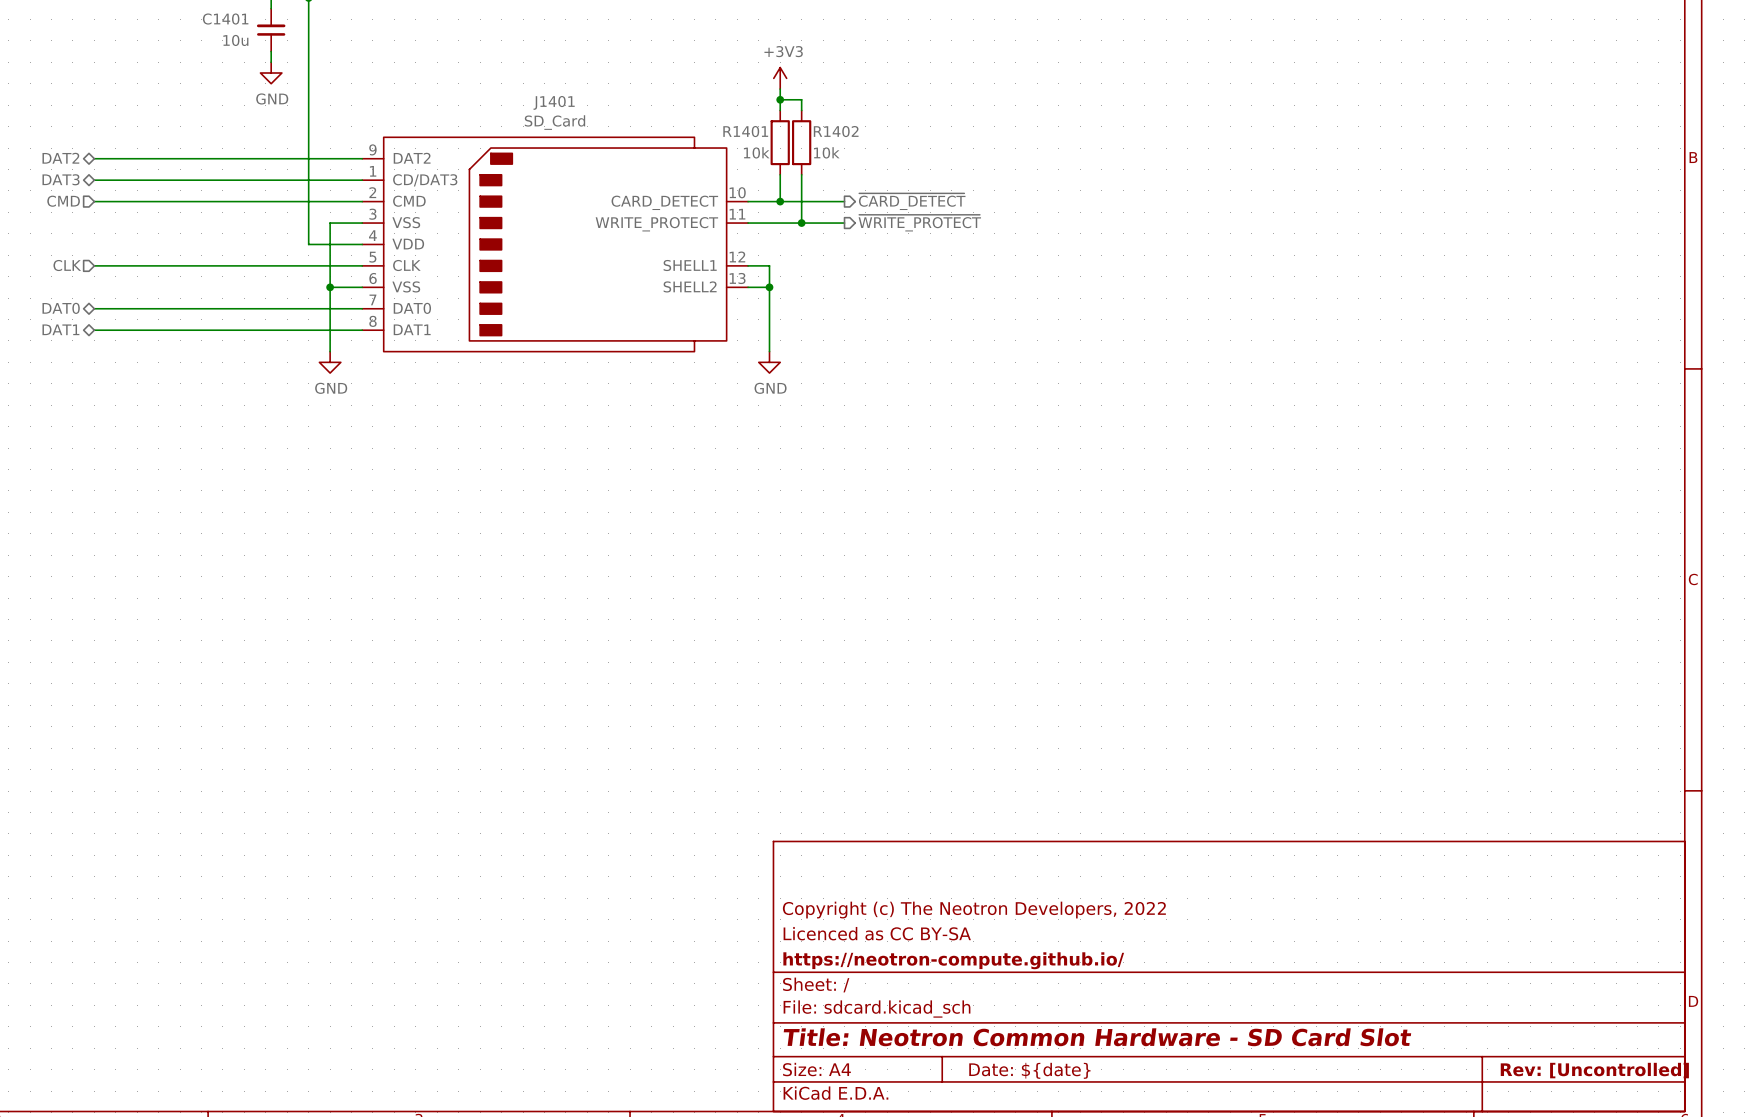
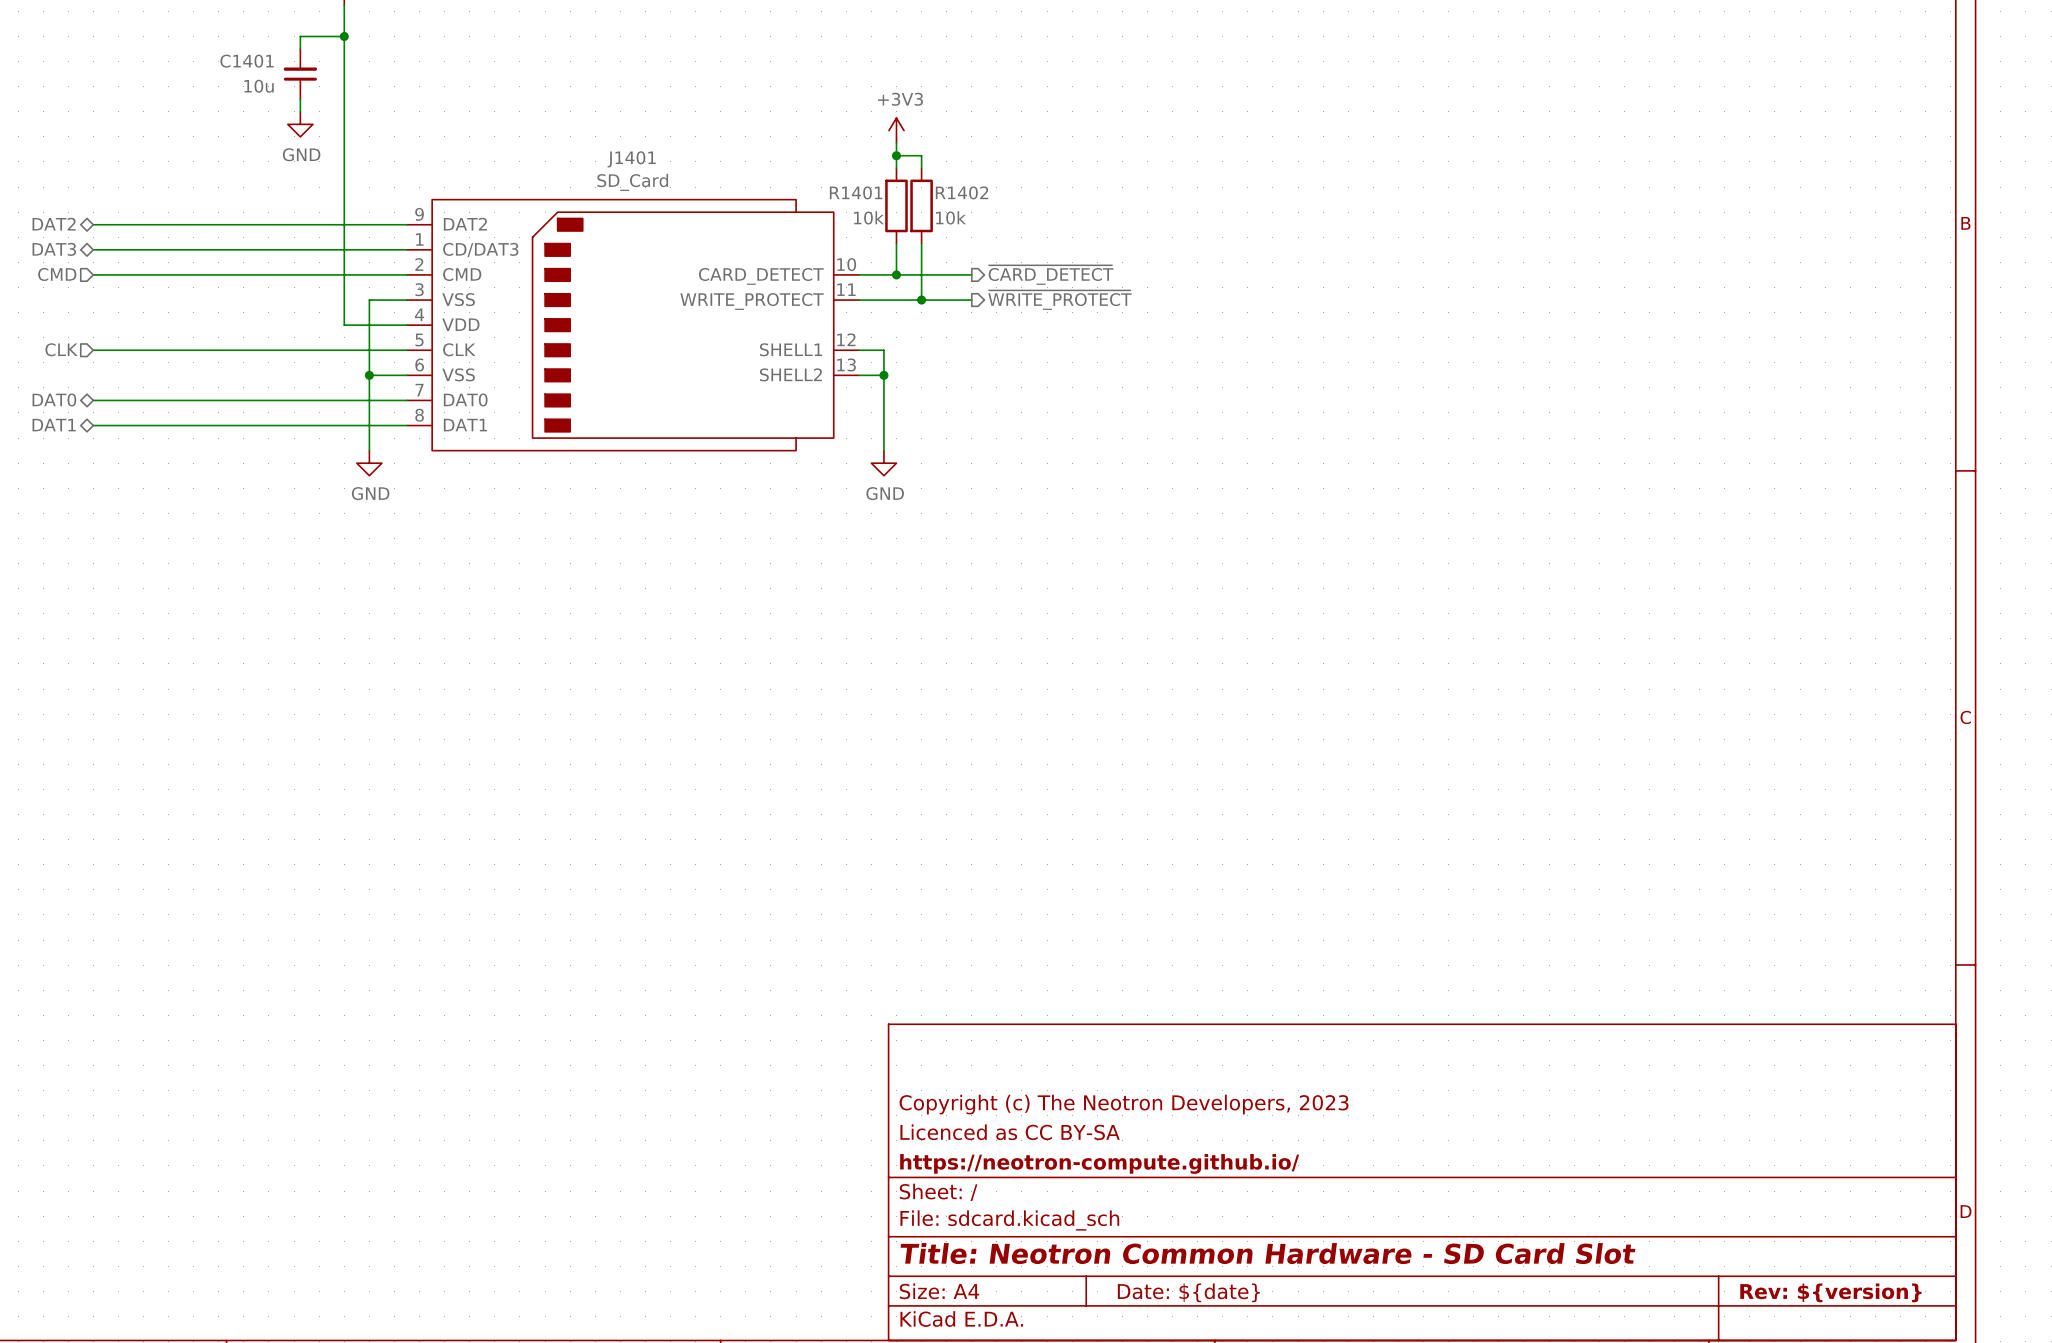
title block: Copyright (c) The Neotron Developers, 2022 (974, 910) -> Copyright (c) The Neotron Developers, 2023 (1124, 1104)
title block: Rev: [Uncontrolled] (1594, 1070) -> Rev: ${version} (1830, 1292)

